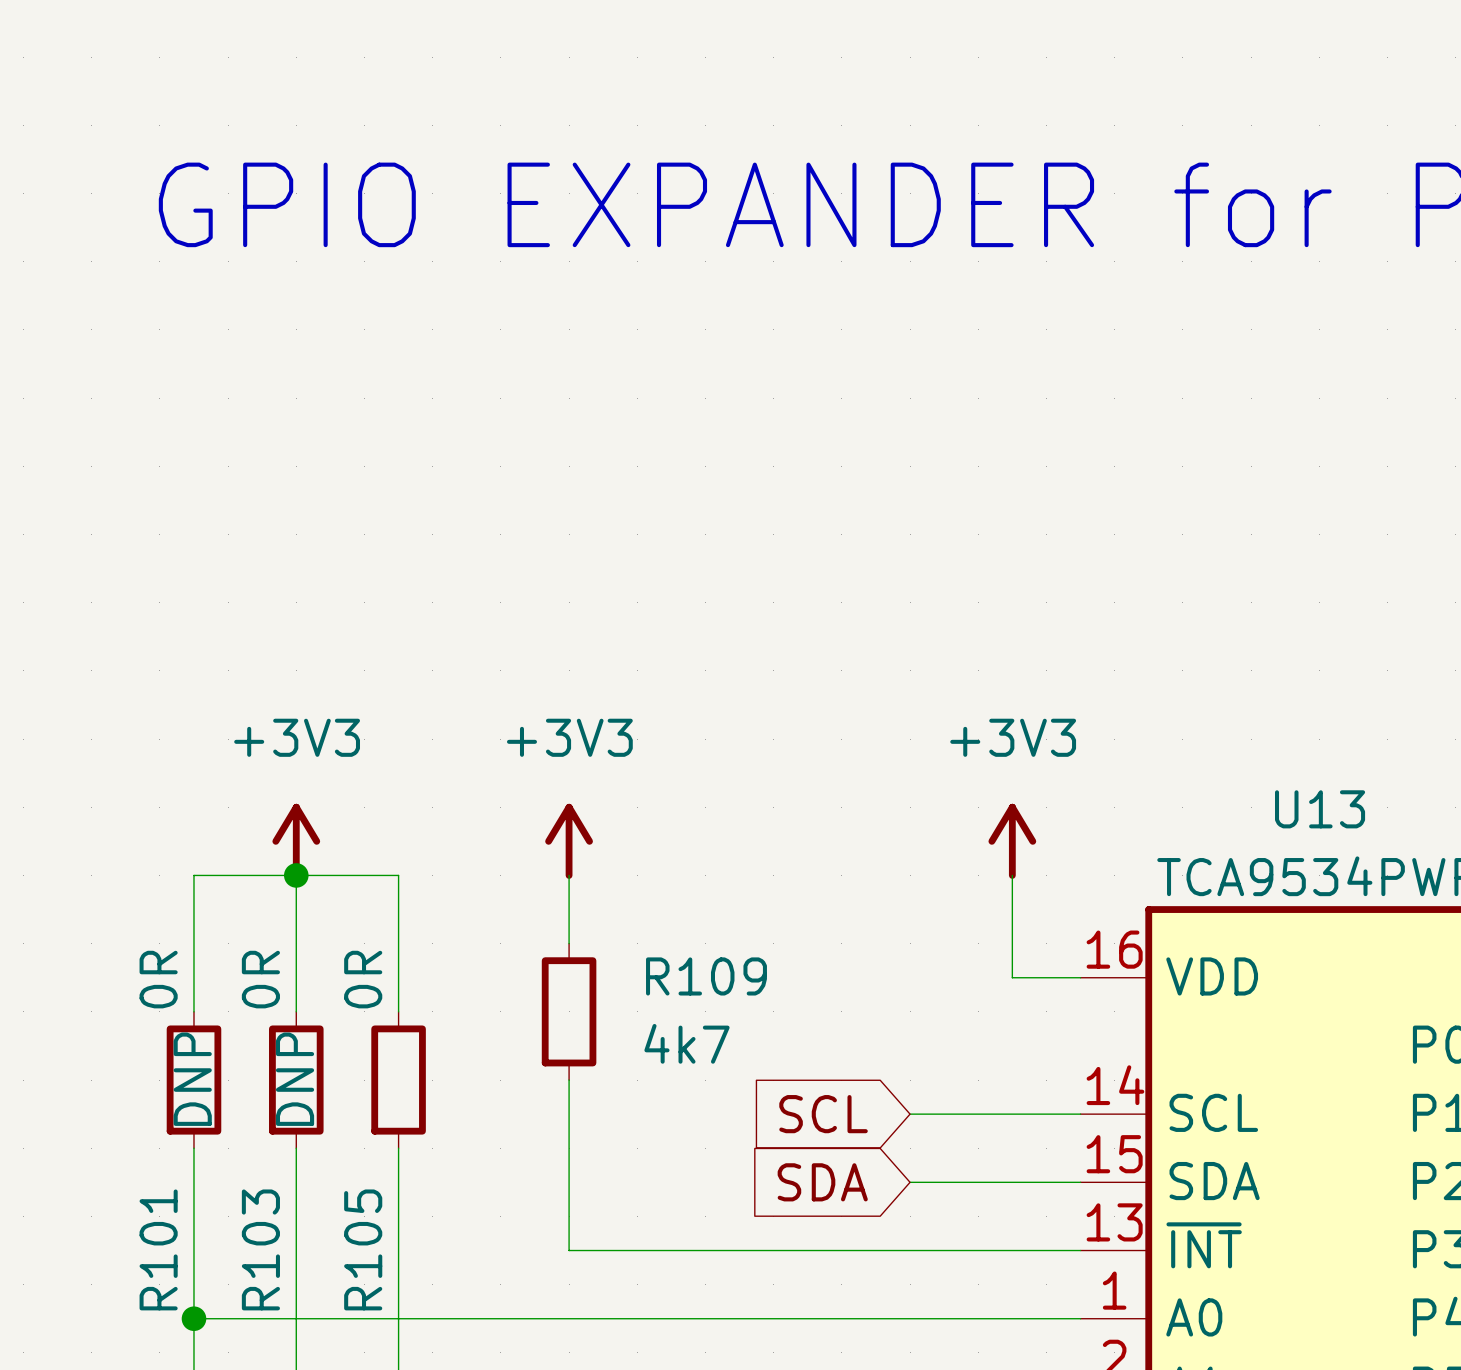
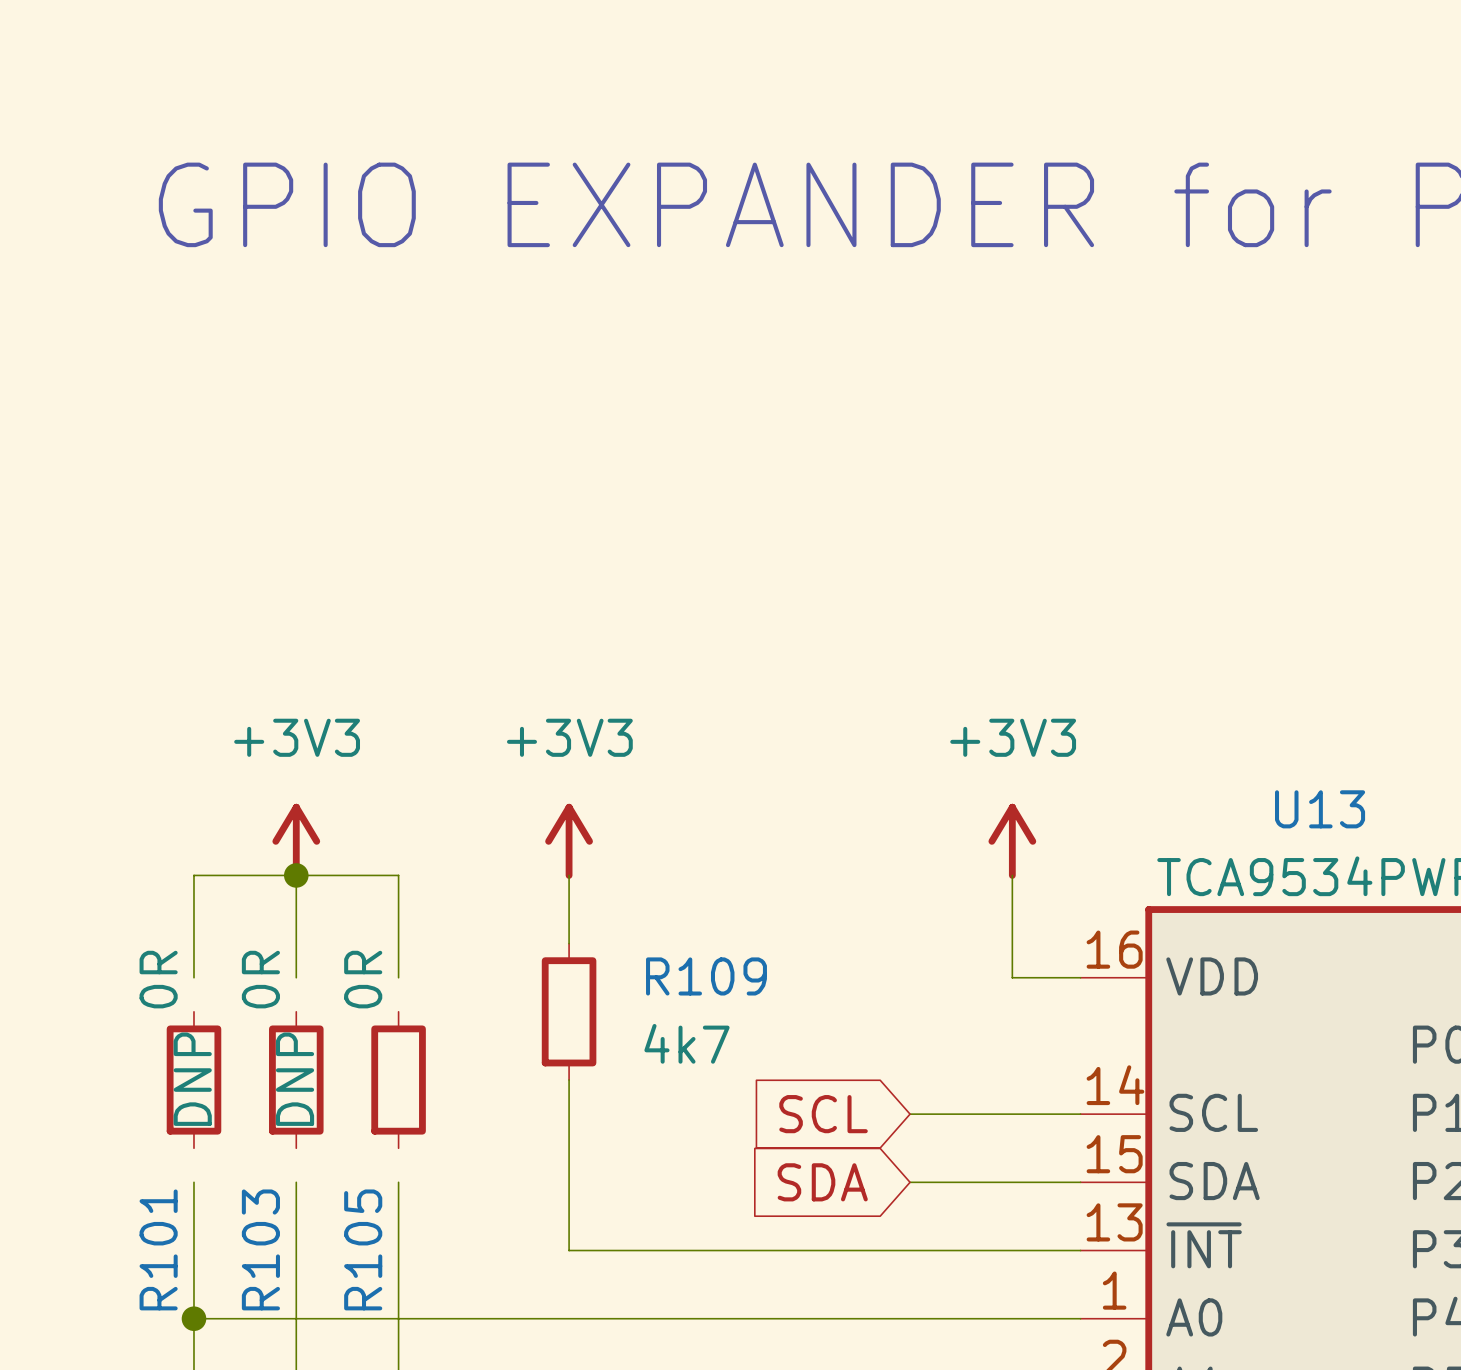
wire: (193, 977) (193, 1011) -> none
wire: (296, 977) (296, 1011) -> none
wire: (398, 977) (398, 1011) -> none
wire: (193, 1148) (193, 1182) -> none
wire: (296, 1148) (296, 1182) -> none
wire: (398, 1148) (398, 1182) -> none

